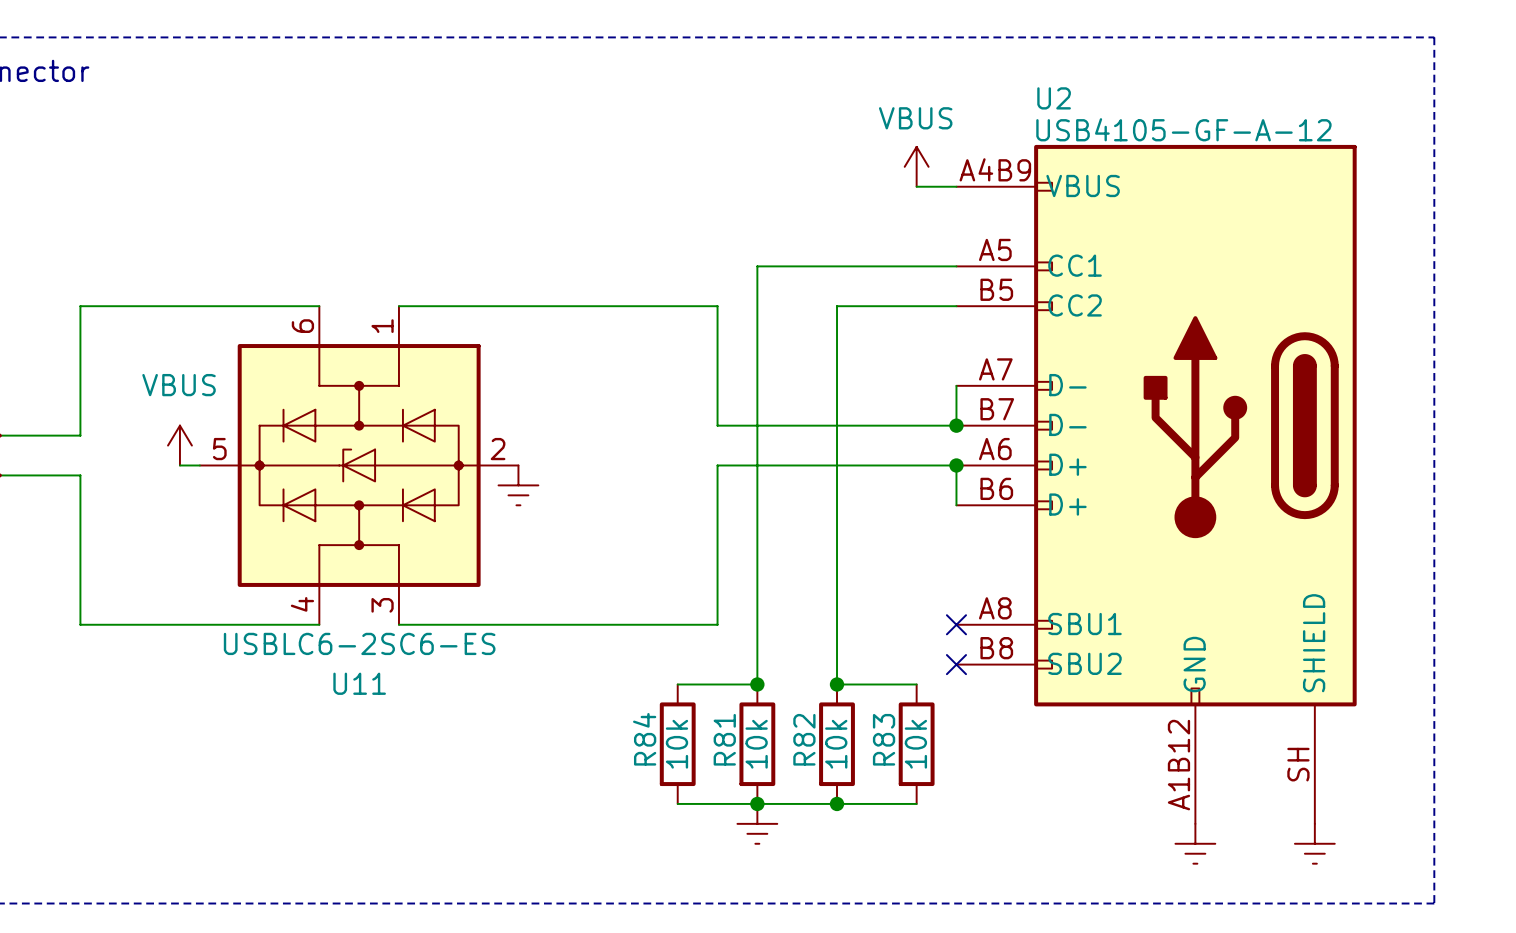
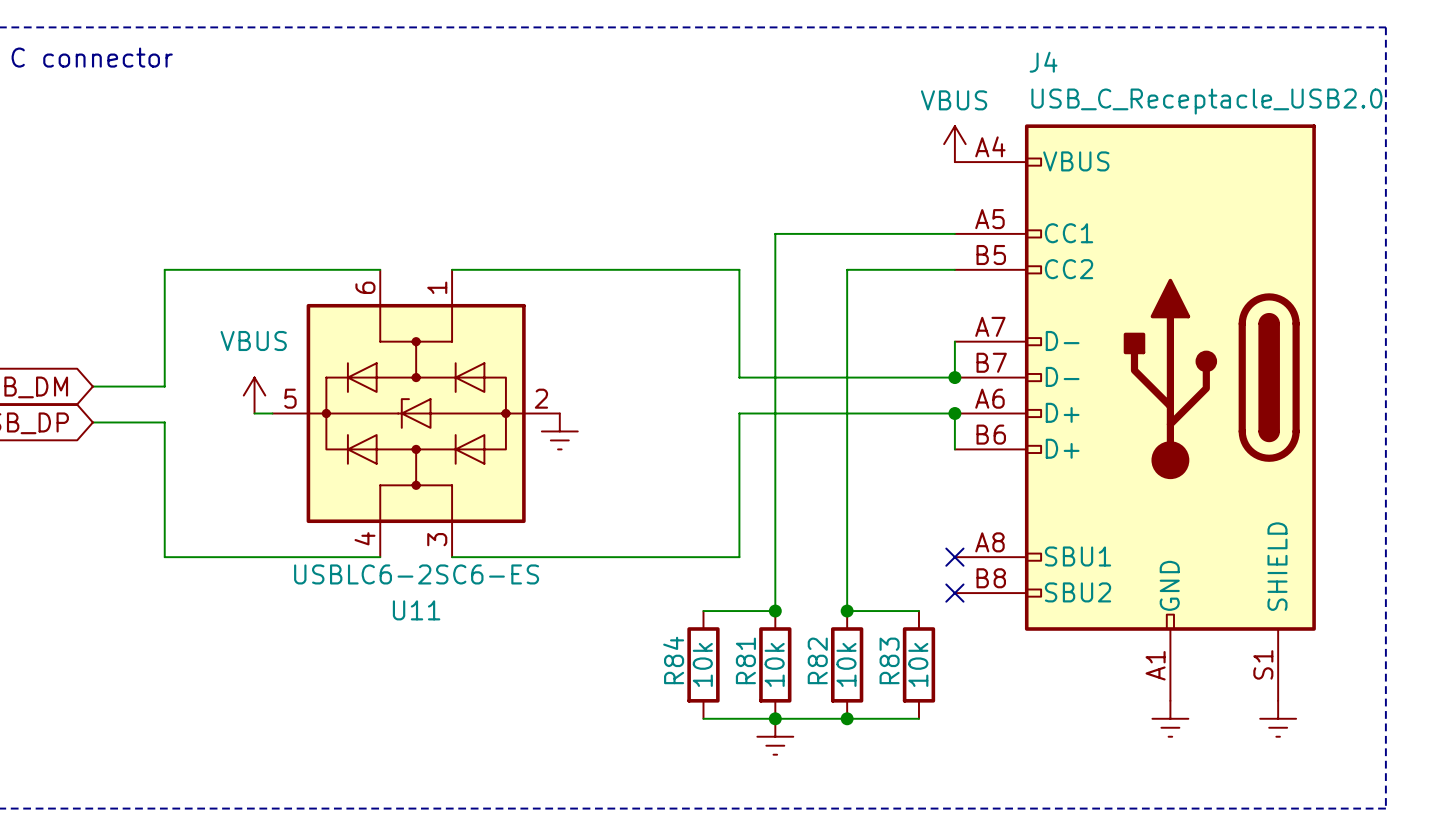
power symbol position: VBUS (916, 166) -> VBUS (954, 144)
wire: (916, 186) (956, 186) -> none
J4: none -> USB_C_Receptacle_USB2.0 (1135, 412)
U2: USB4105-GF-A-12 (1156, 484) -> none
power symbol position: (1195, 843) -> (1170, 718)
power symbol position: (1314, 843) -> (1278, 718)

